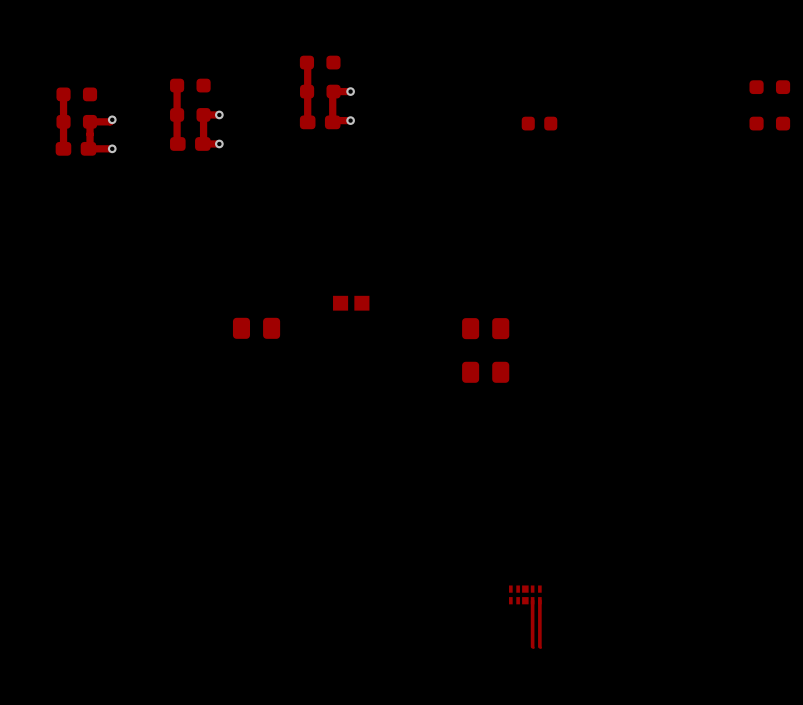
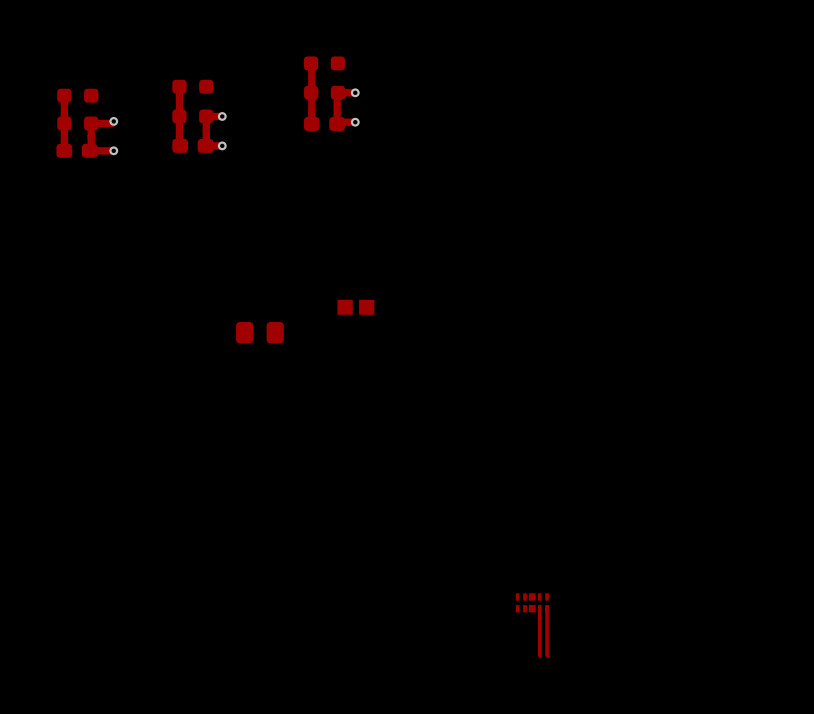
part: (769, 87) -> none
part: (539, 123) -> none
part: (769, 123) -> none
part: (485, 328) -> none
part: (485, 372) -> none

